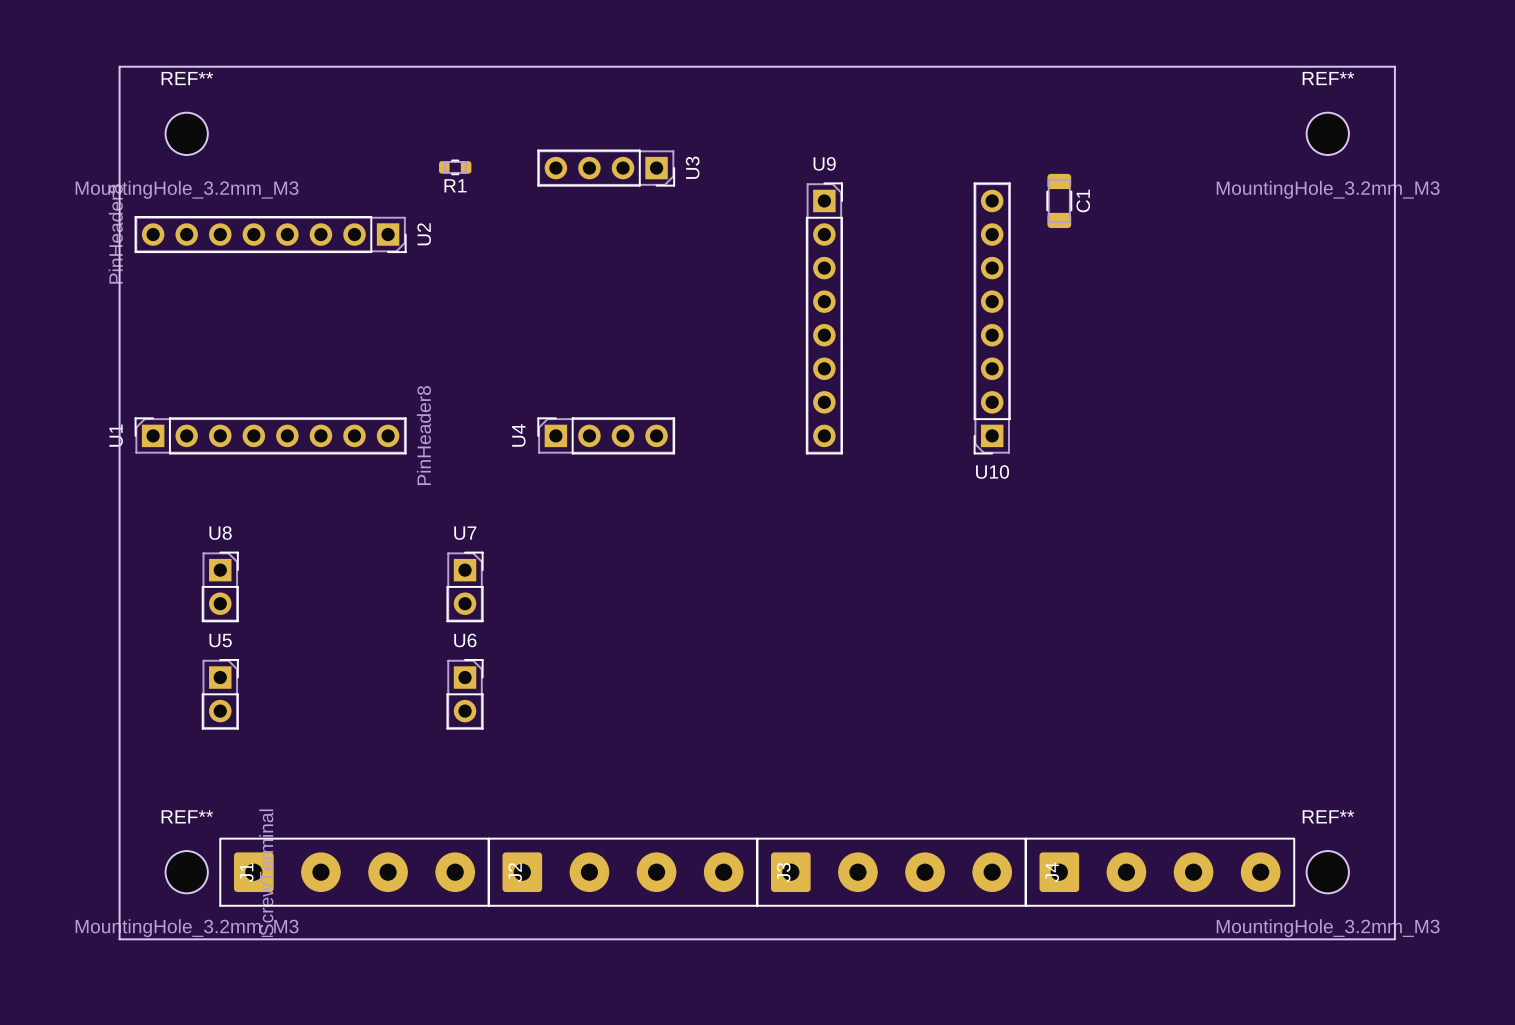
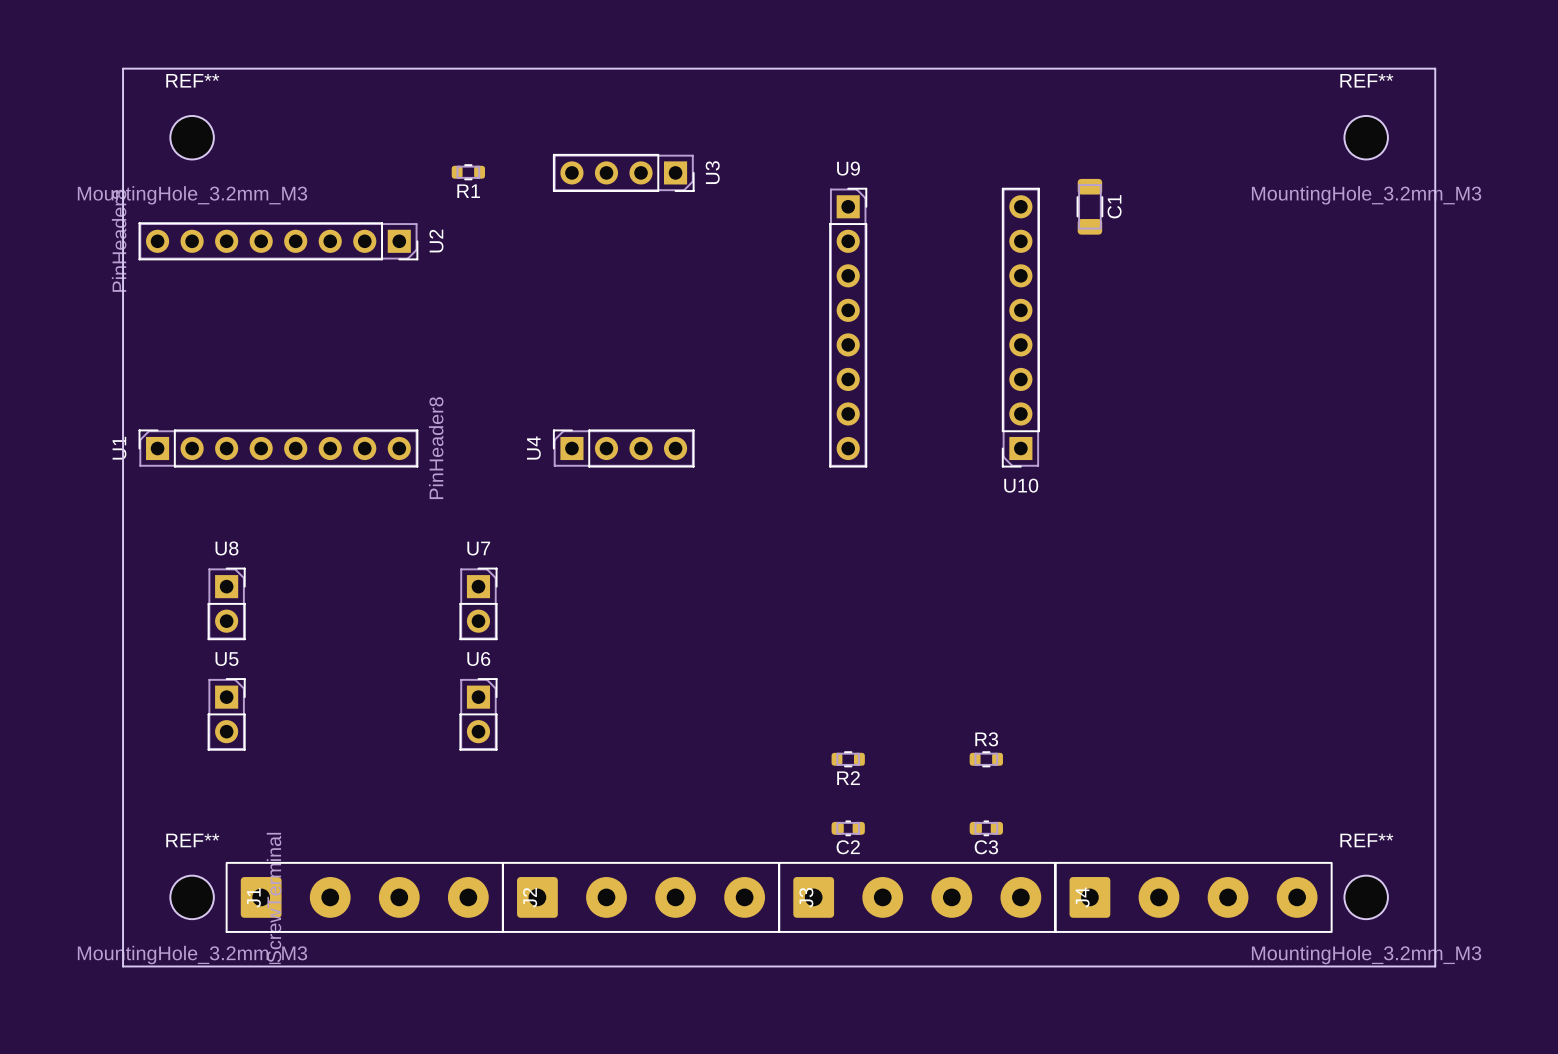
R2: none -> (848, 759)
R3: none -> (986, 759)
C2: none -> (848, 828)
C3: none -> (986, 828)

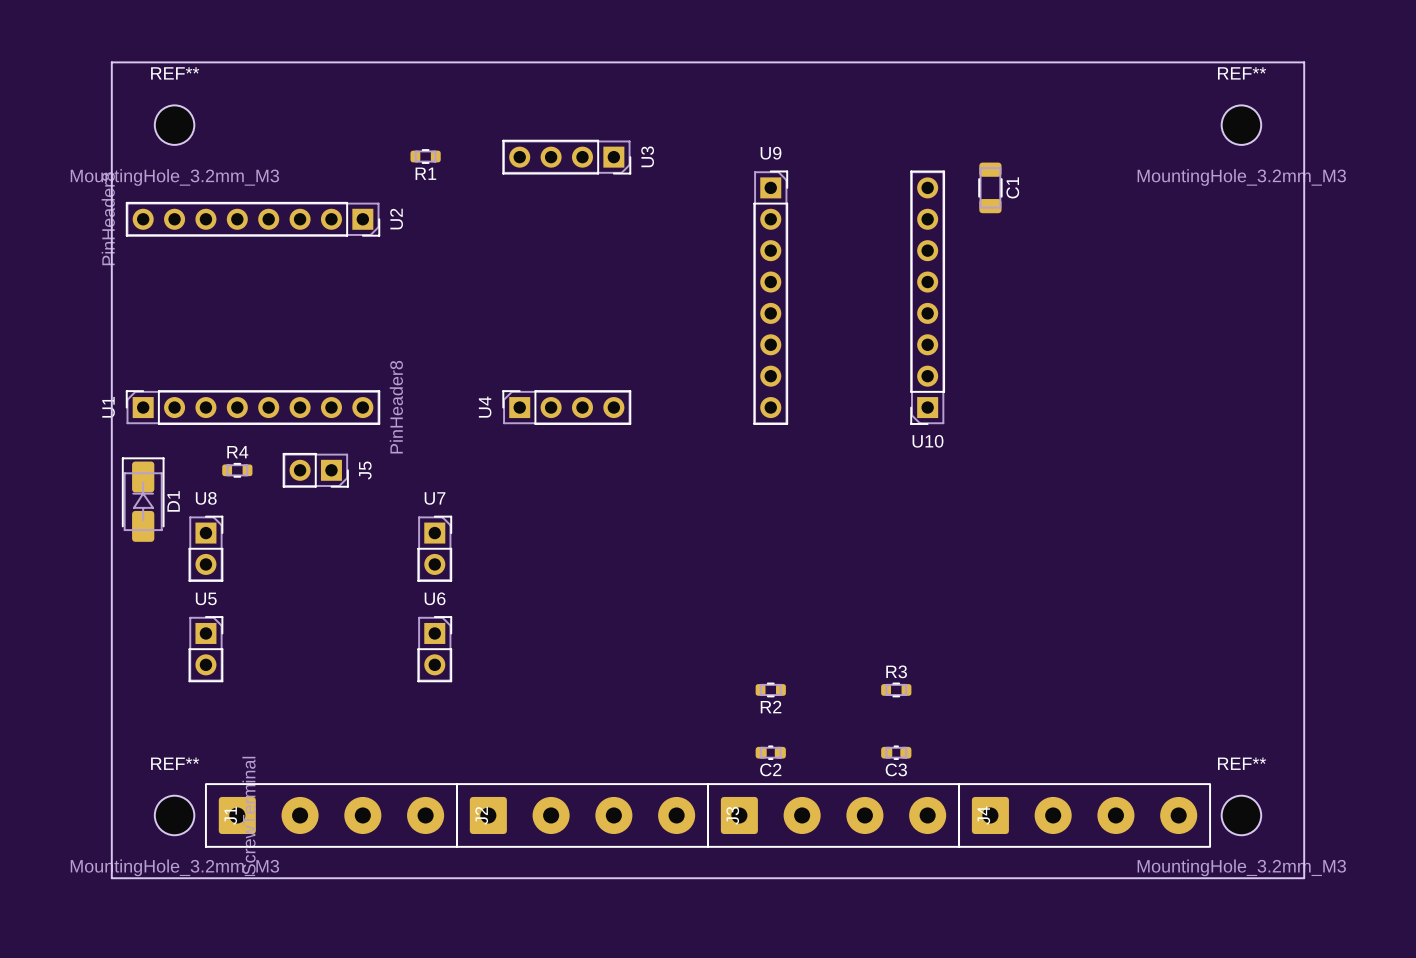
R4: none -> (237, 470)
J5: none -> (315, 470)
D1: none -> (143, 499)

